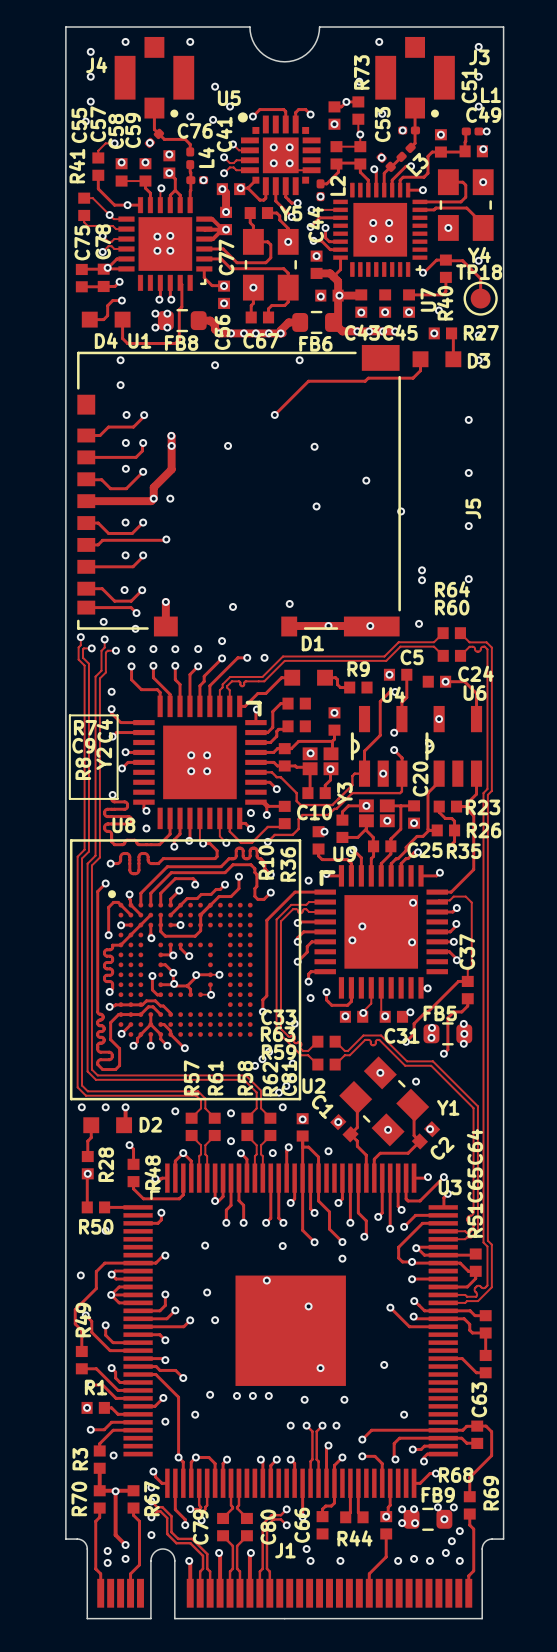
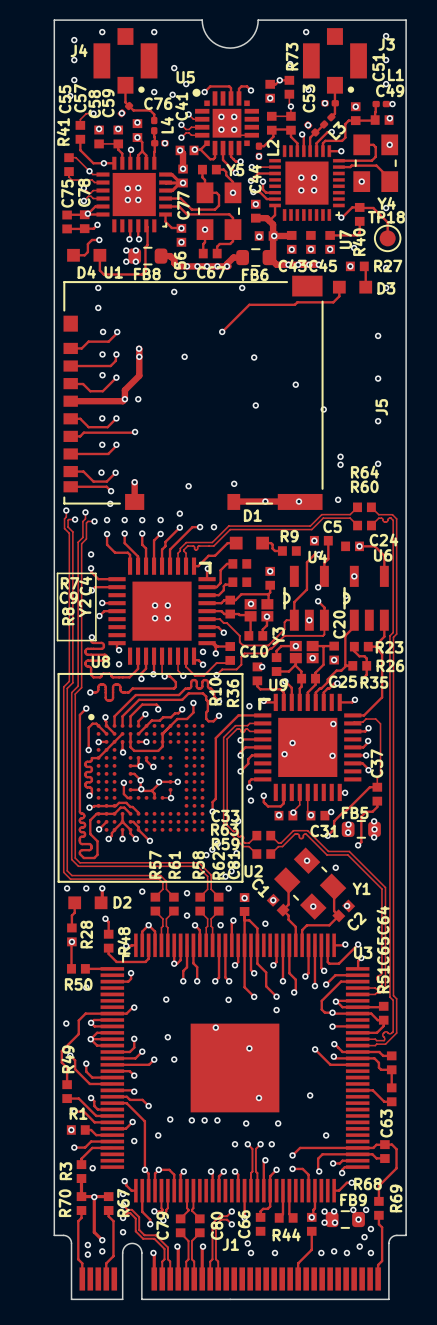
via: (103, 621) -> none

